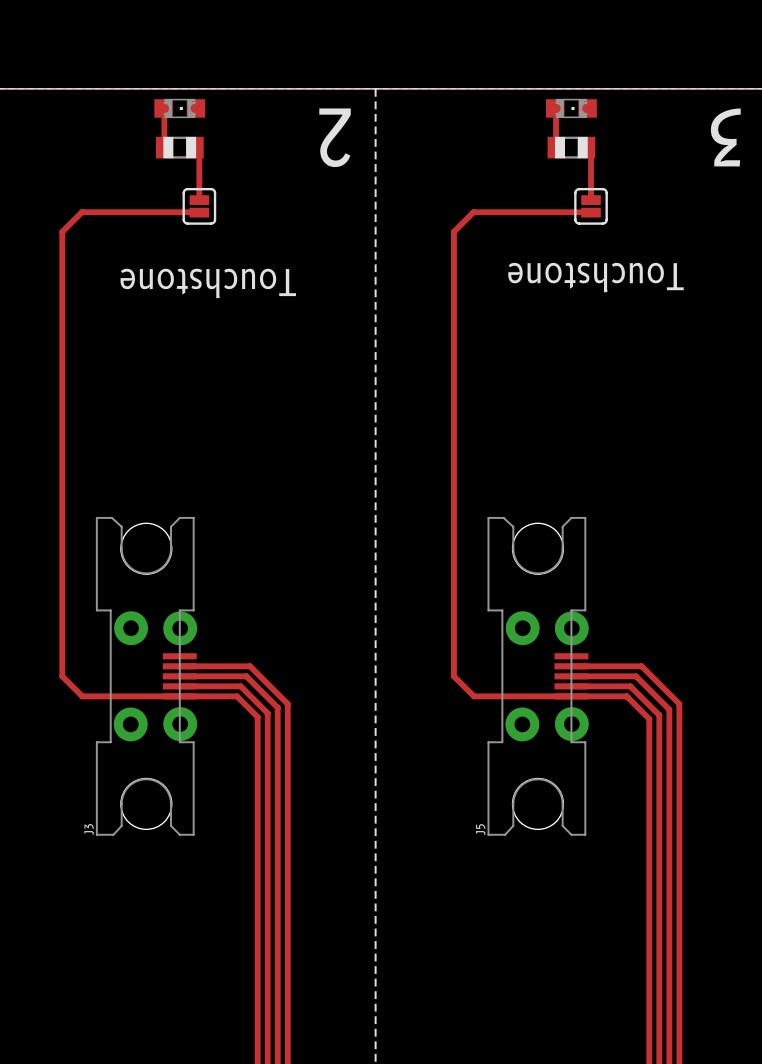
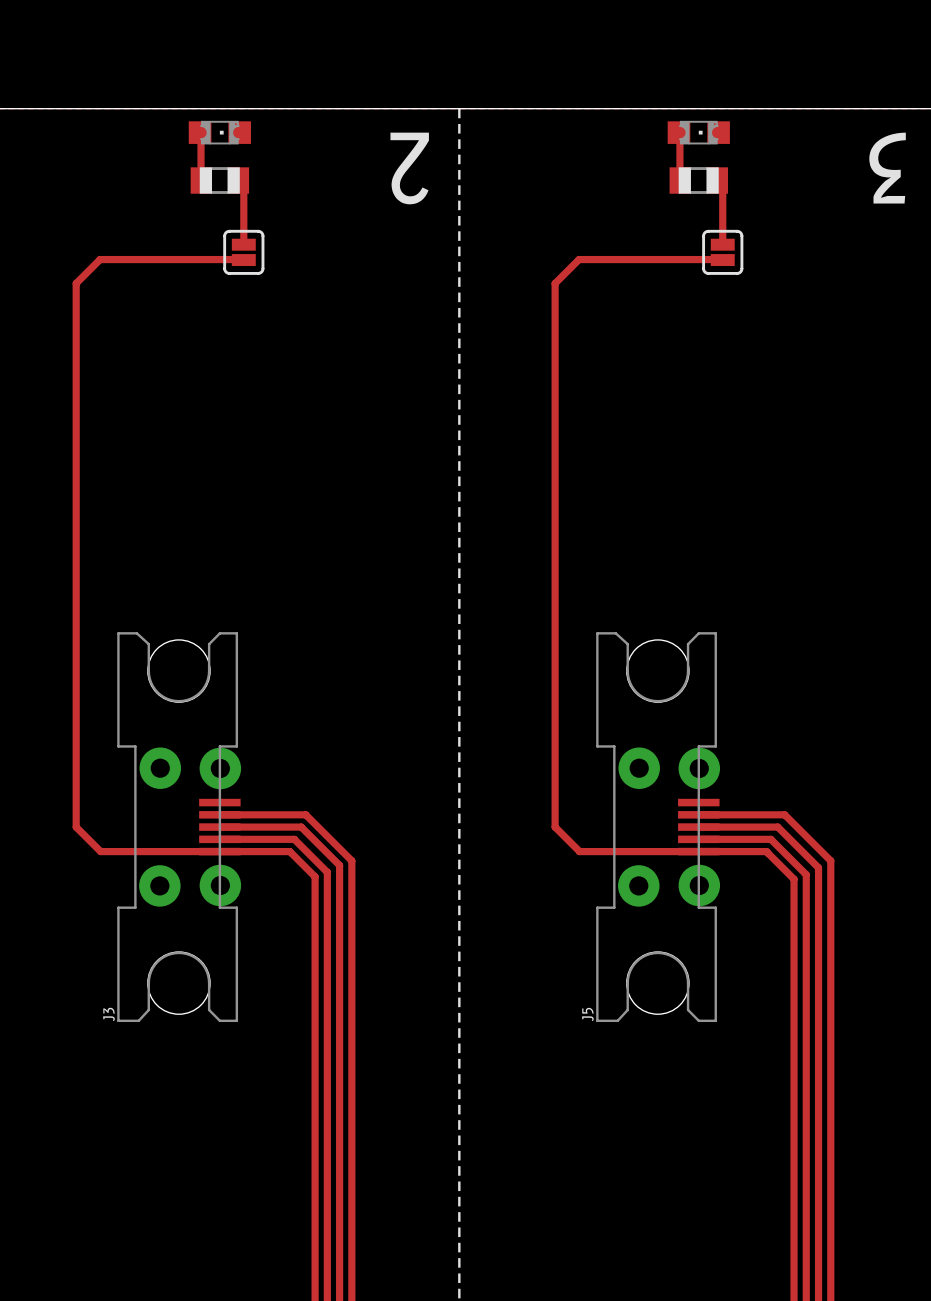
text: Touchstone (595, 277) -> none
text: Touchstone (208, 283) -> none

